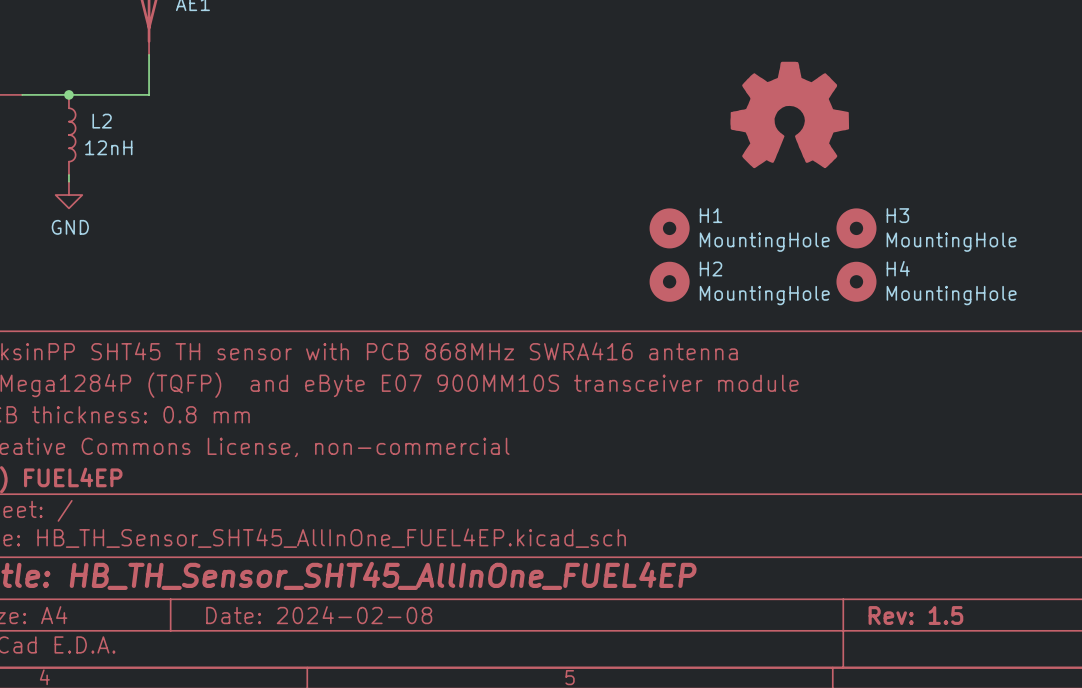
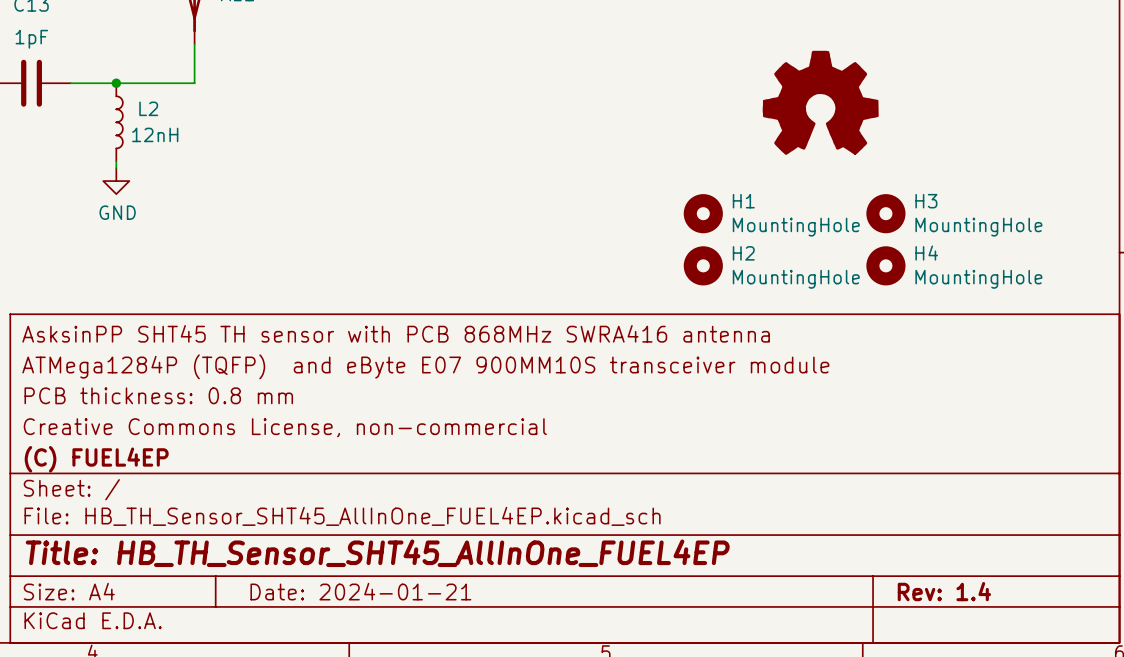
title block: Date: 2024-02-08 (319, 615) -> Date: 2024-01-21 (360, 591)
title block: Rev: 1.5 (915, 615) -> Rev: 1.4 (944, 591)

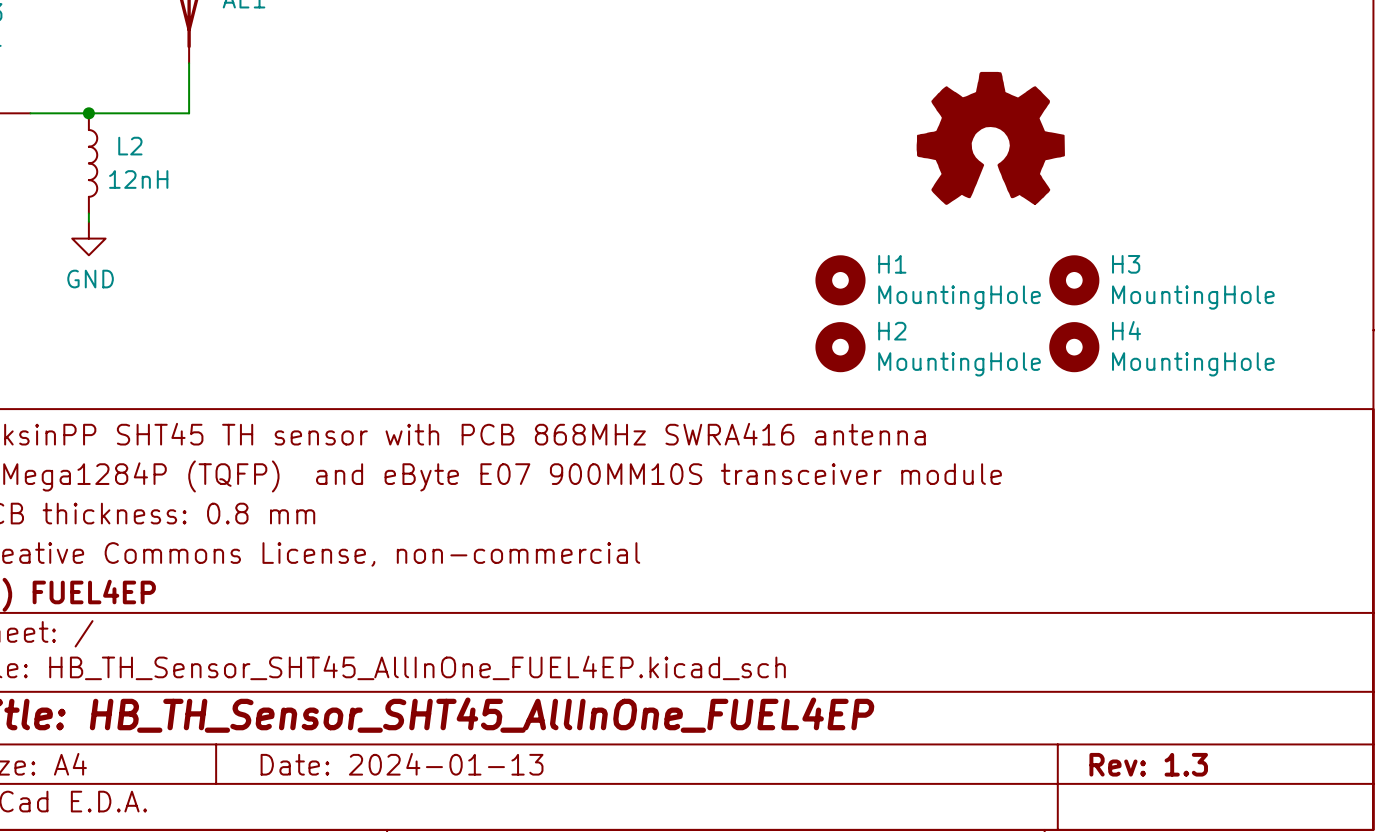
title block: Date: 2024-01-21 (360, 591) -> Date: 2024-01-13 (402, 764)
title block: Rev: 1.4 (944, 591) -> Rev: 1.3 (1148, 764)

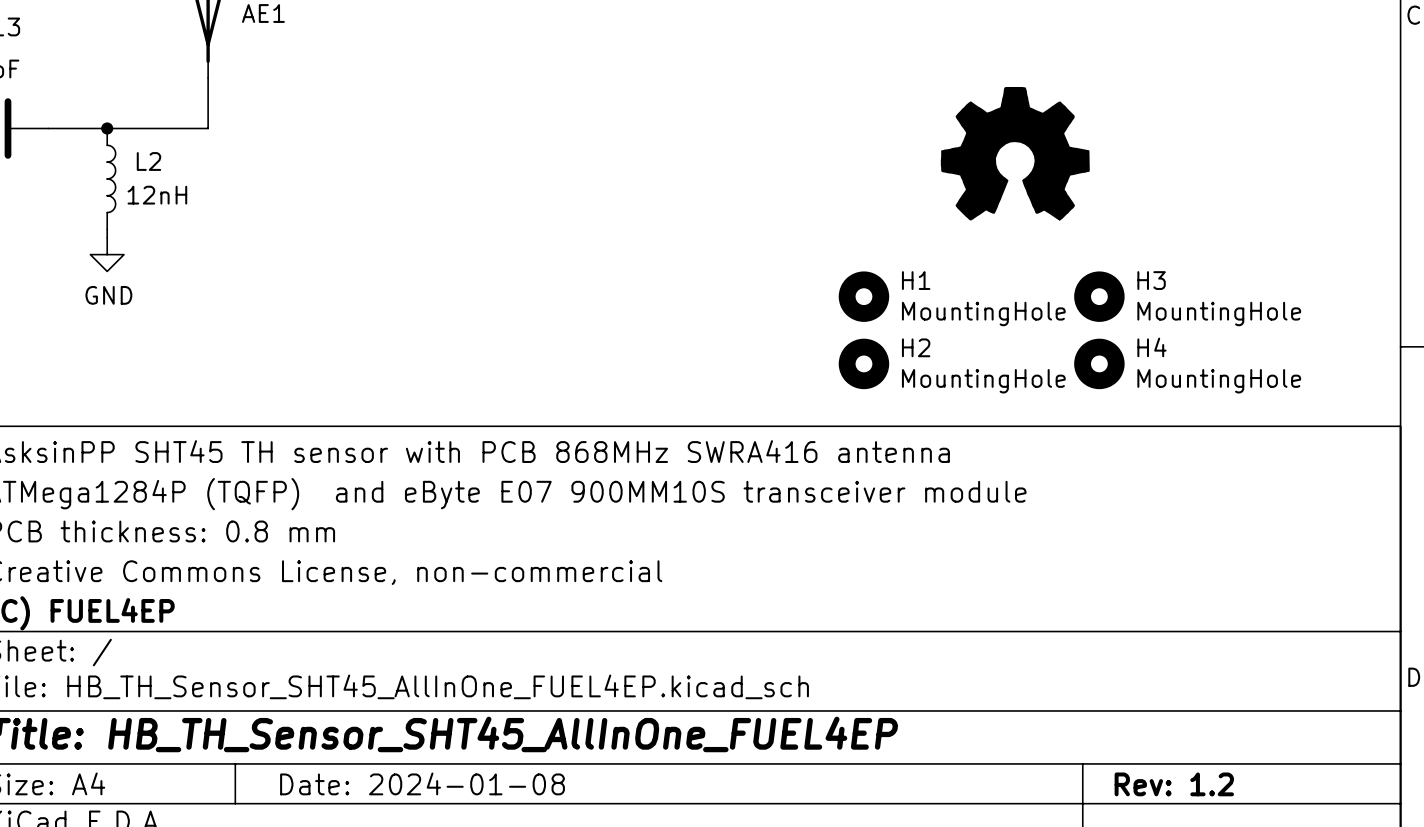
title block: Date: 2024-01-13 (402, 764) -> Date: 2024-01-08 (422, 783)
title block: Rev: 1.3 (1148, 764) -> Rev: 1.2 (1174, 784)

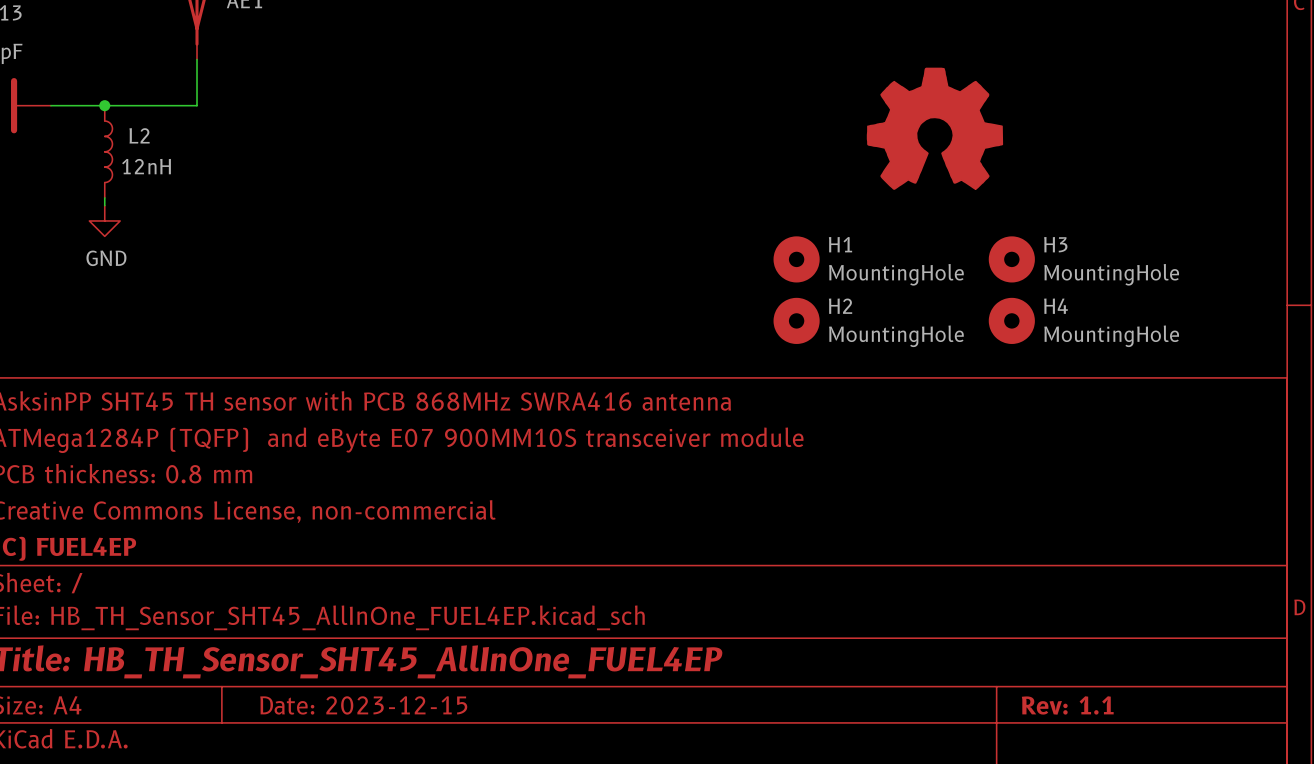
title block: Date: 2024-01-08 (422, 783) -> Date: 2023-12-15 (363, 705)
title block: Rev: 1.2 (1174, 784) -> Rev: 1.1 (1067, 705)

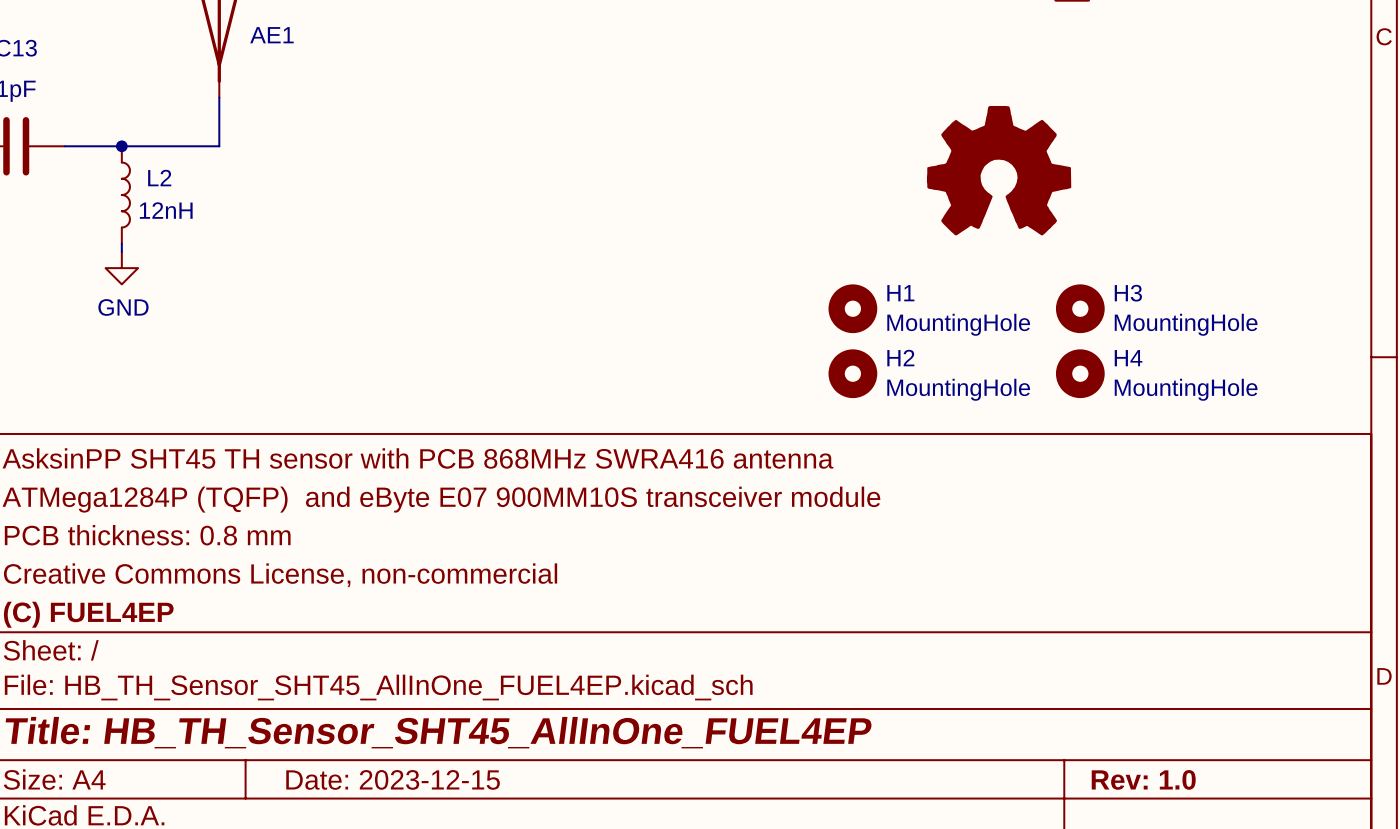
title block: Rev: 1.1 (1067, 705) -> Rev: 1.0 (1143, 779)

